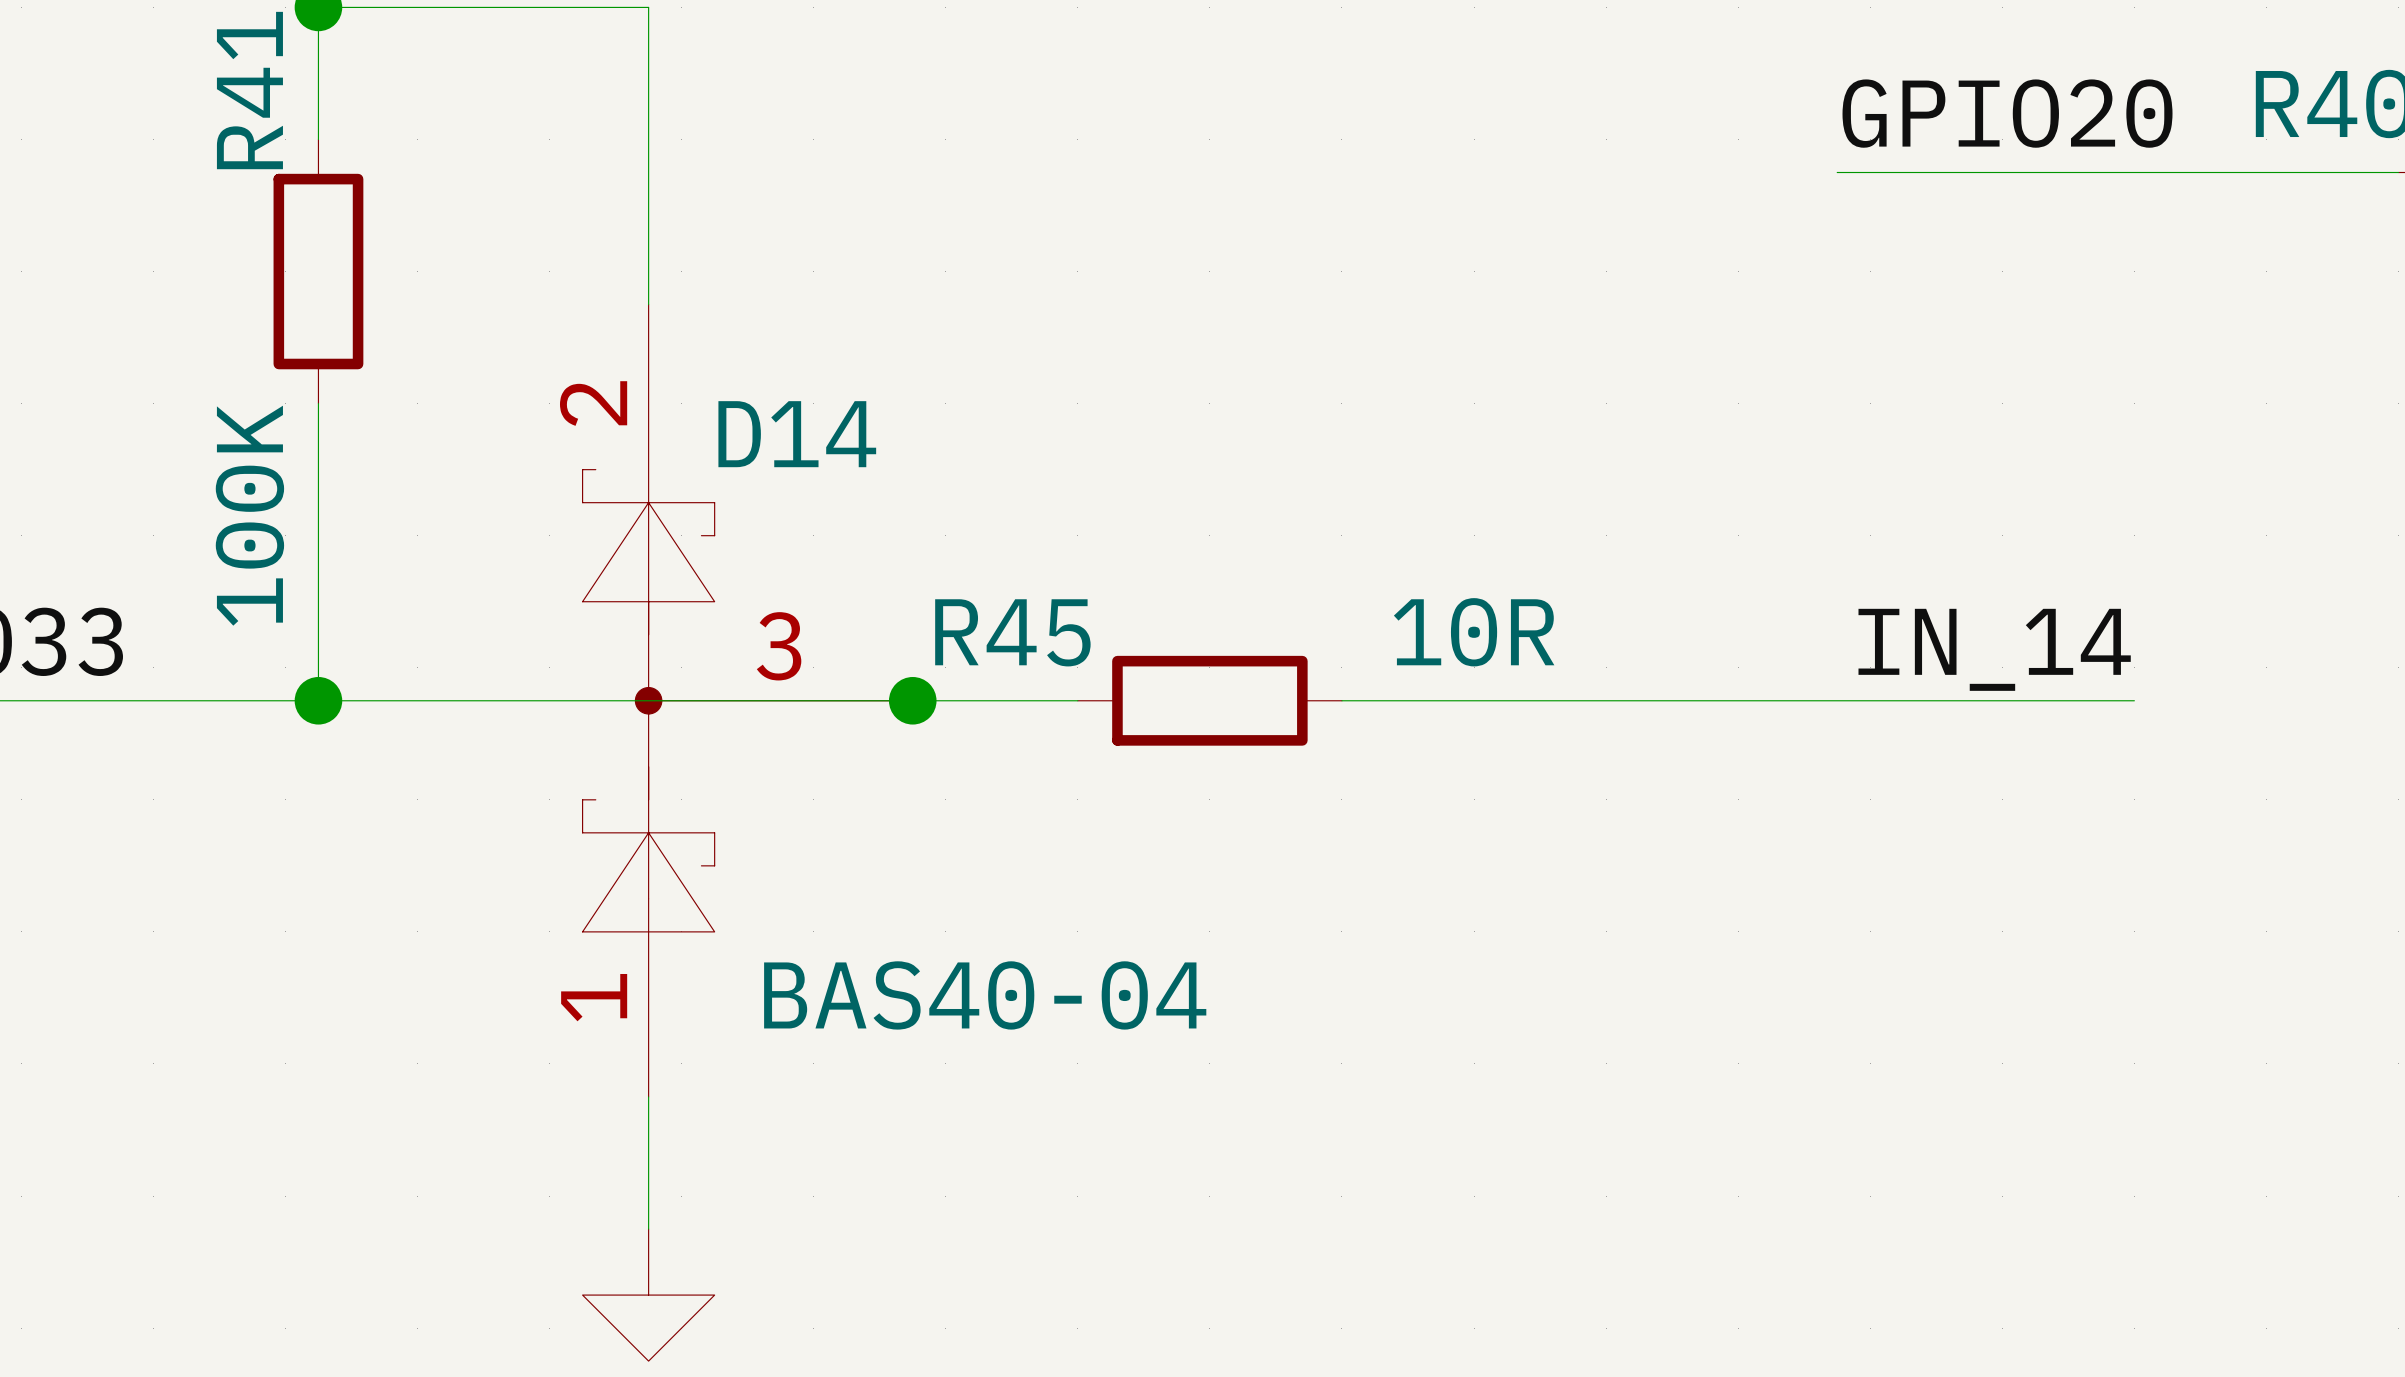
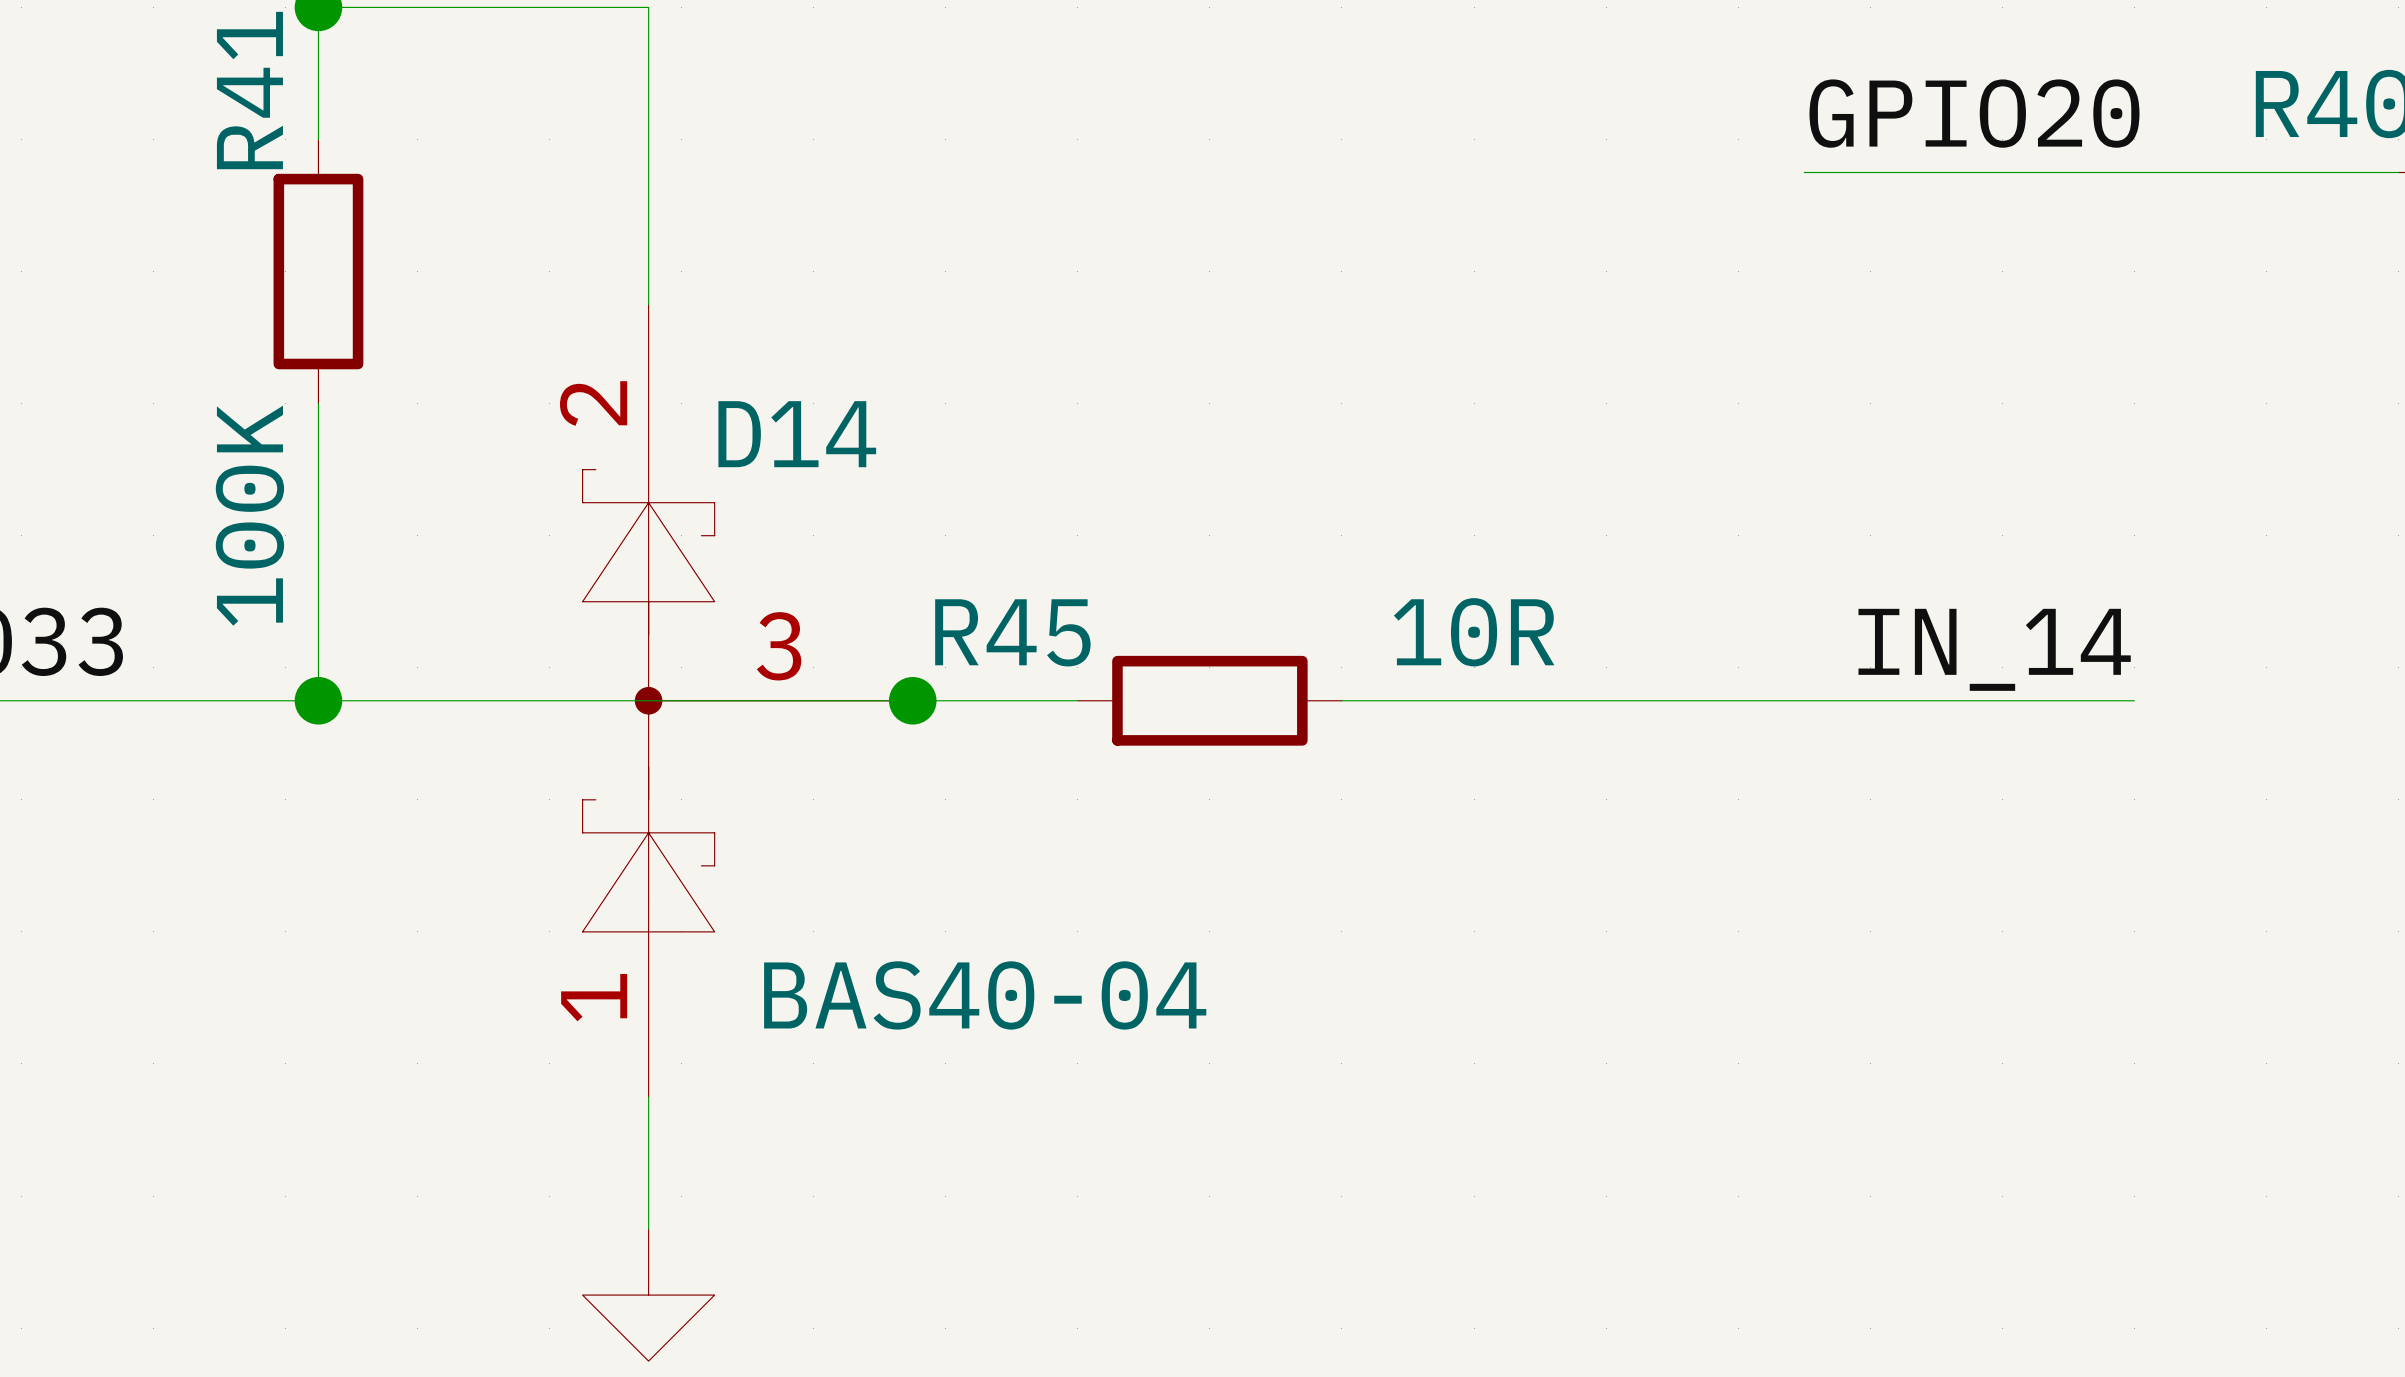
label position: GPIO20 (2007, 113) -> GPIO20 (1974, 113)
wire: none -> (1804, 172) (1837, 172)

